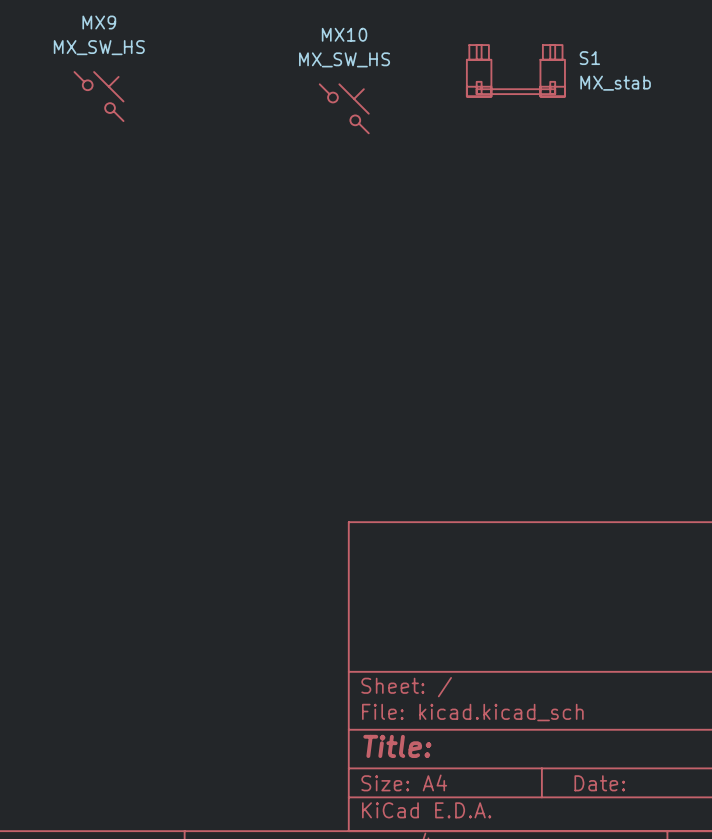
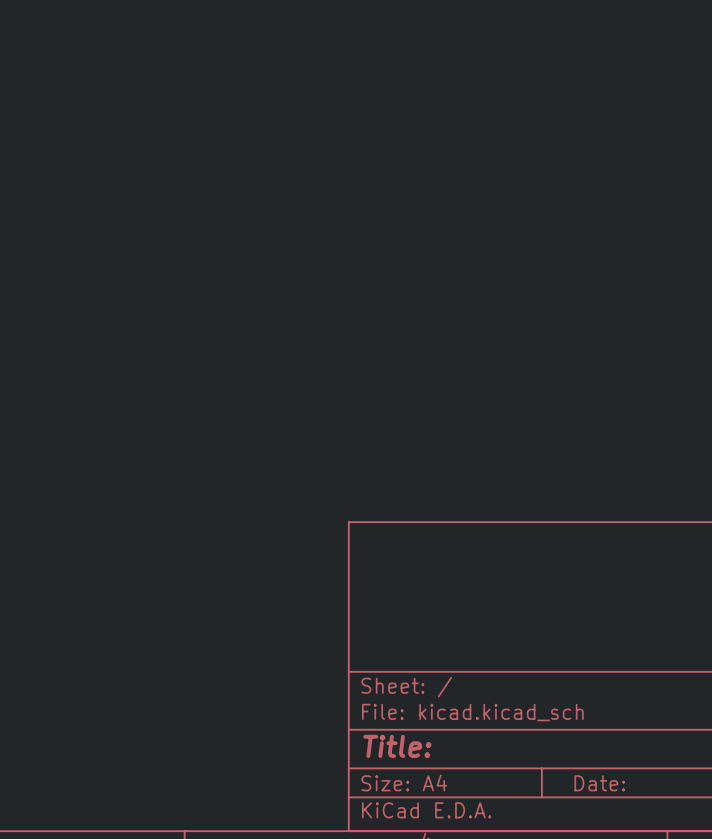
S1: MX_stab (515, 70) -> none
MX9: MX_SW_HS (98, 96) -> none
MX10: MX_SW_HS (344, 108) -> none

